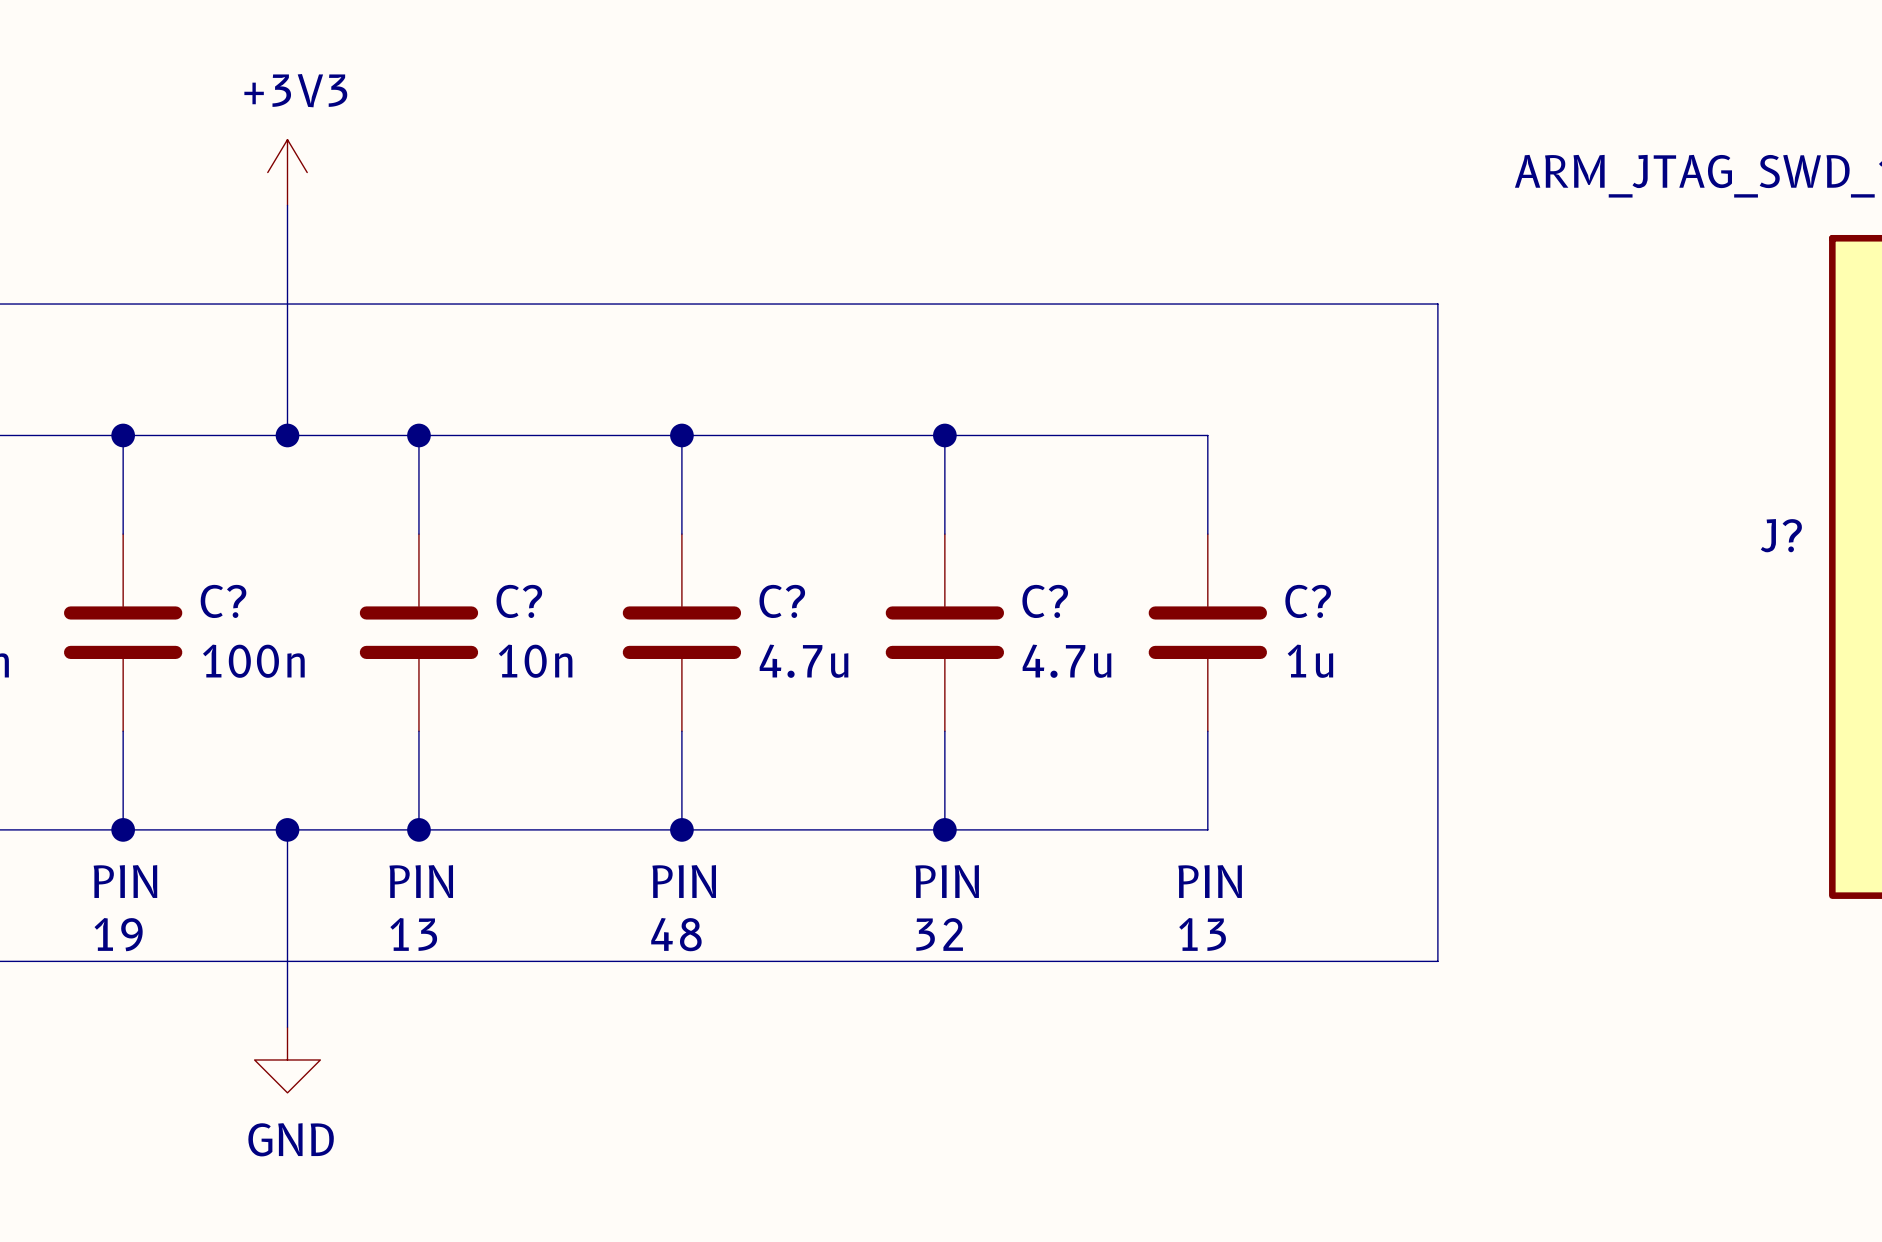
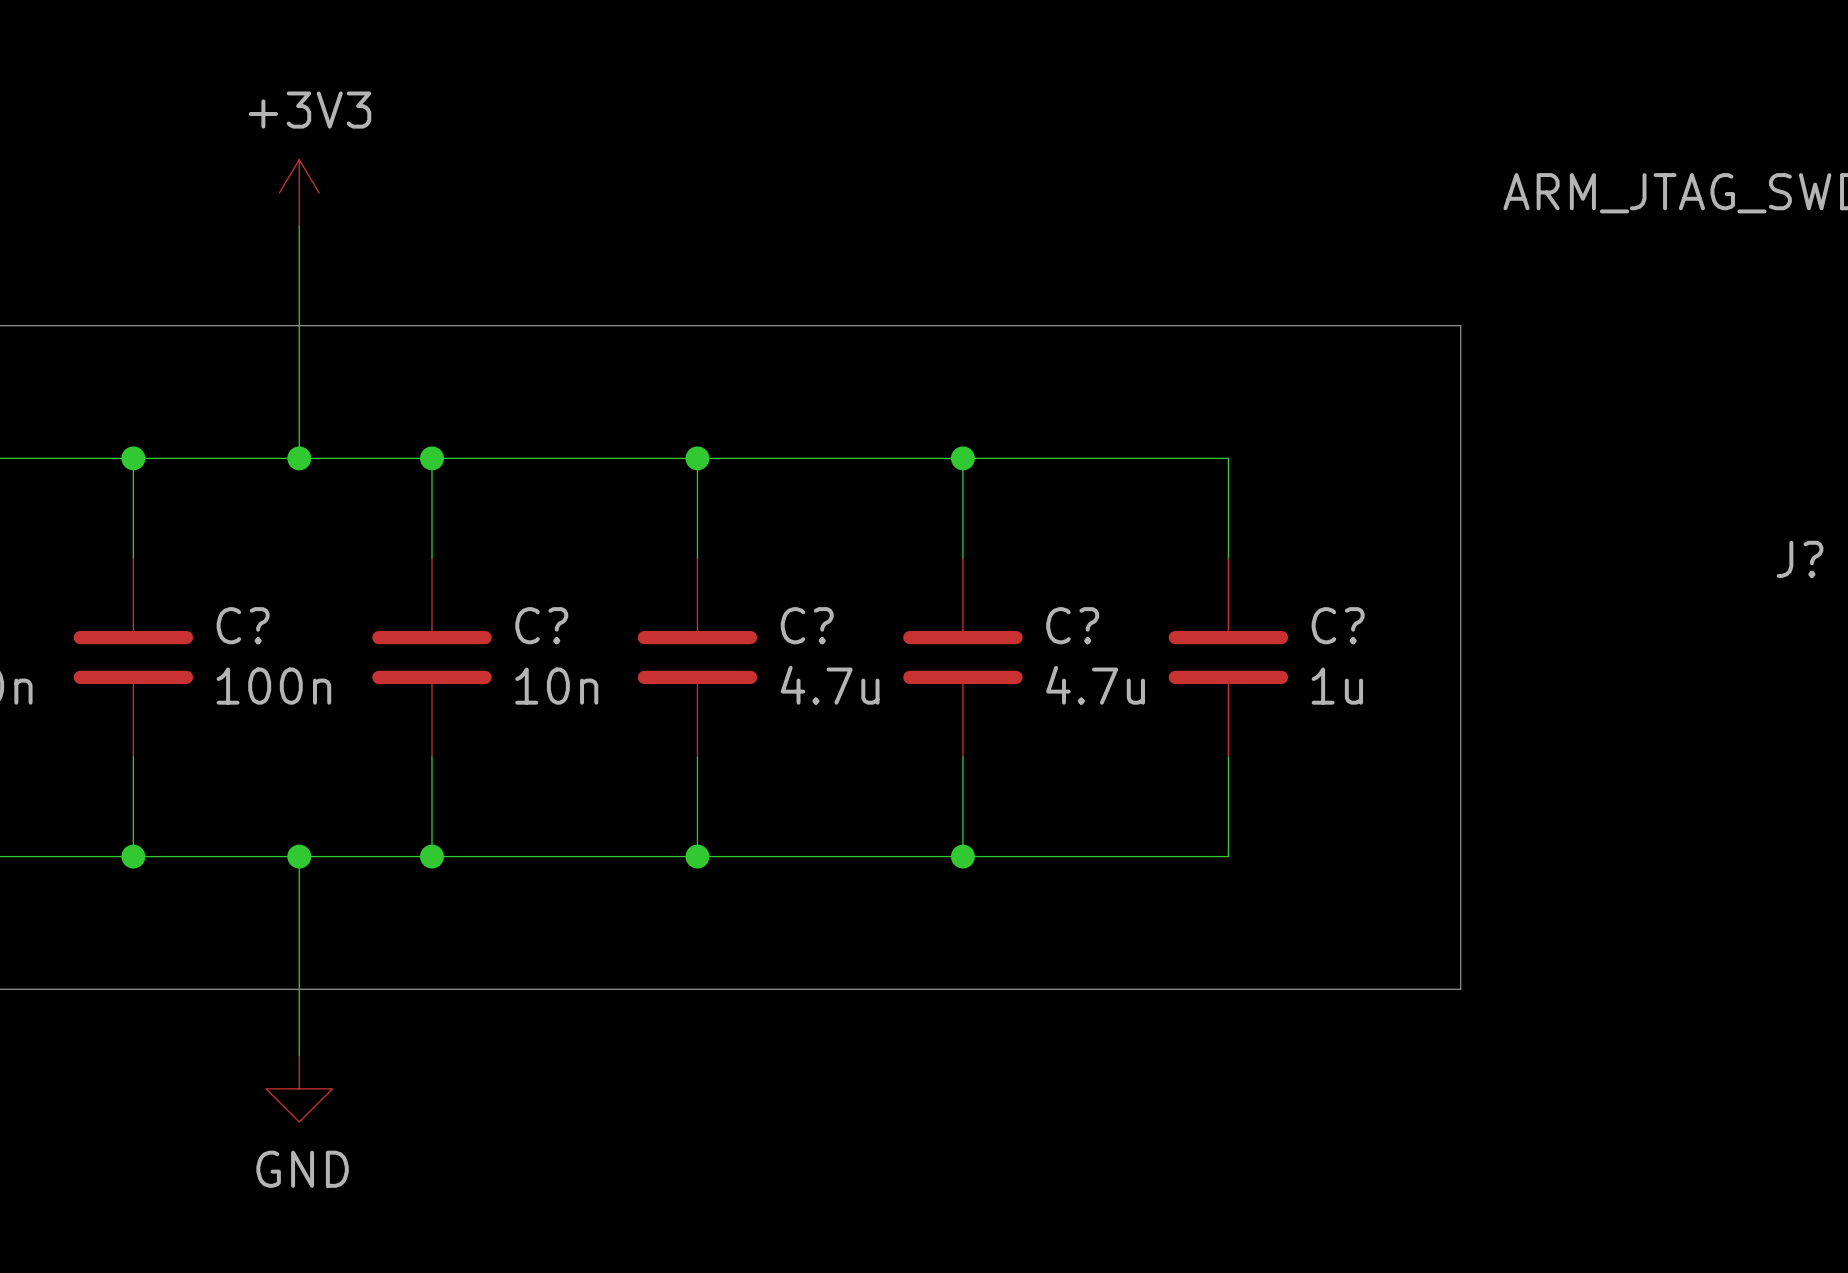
text: PIN (125, 881) -> none
text: PIN (421, 881) -> none
text: PIN (684, 881) -> none
text: PIN (947, 881) -> none
text: PIN (1210, 881) -> none
text: 19 (118, 934) -> none
text: 13 (413, 934) -> none
text: 48 (676, 934) -> none
text: 32 (939, 934) -> none
text: 13 (1202, 934) -> none

